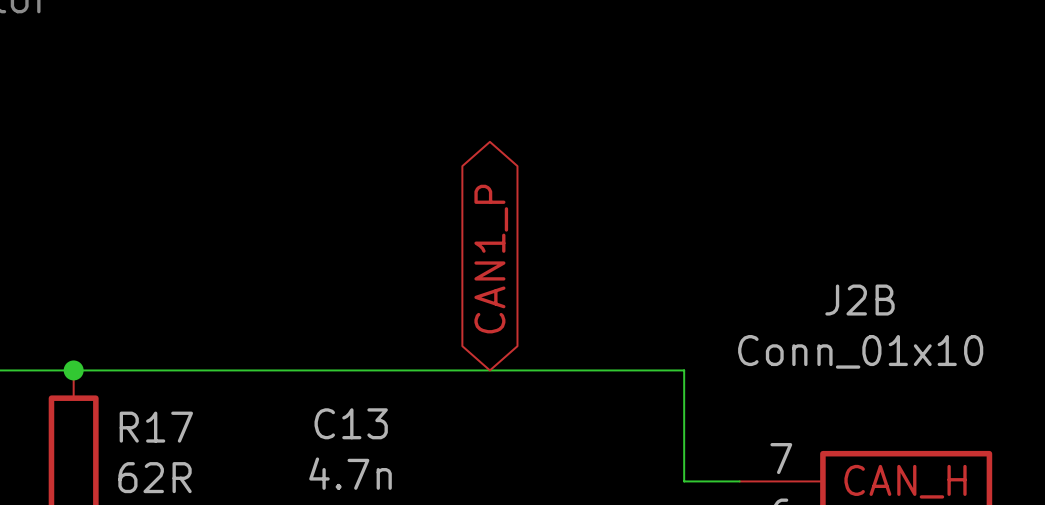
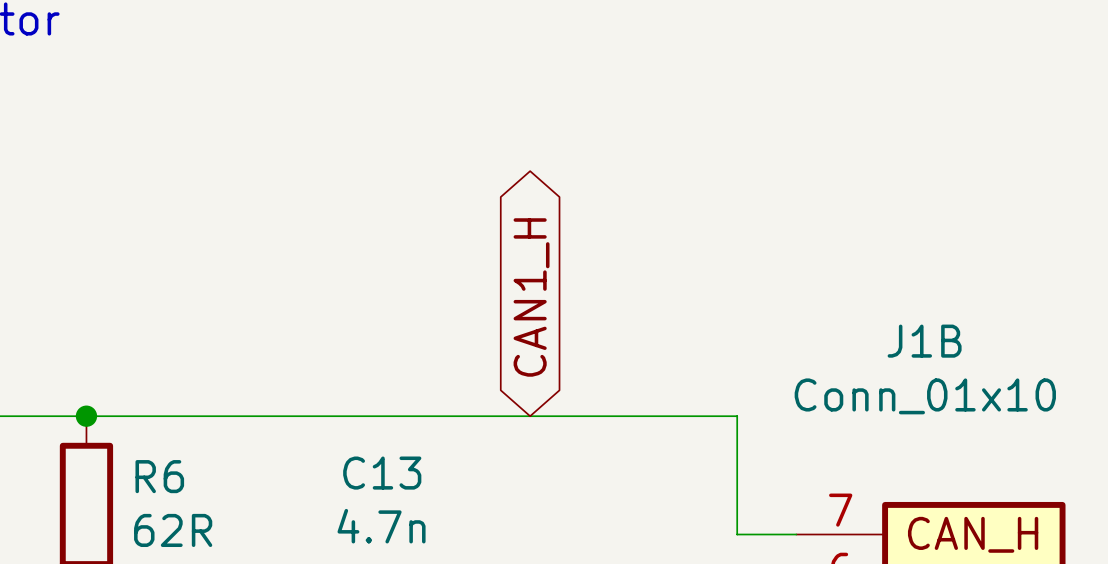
global label: CAN1_P (491, 259) -> CAN1_H (531, 297)
J2B name: J2B (860, 300) -> J1B (924, 341)
R17 name: R17 (156, 427) -> R6 (159, 476)

